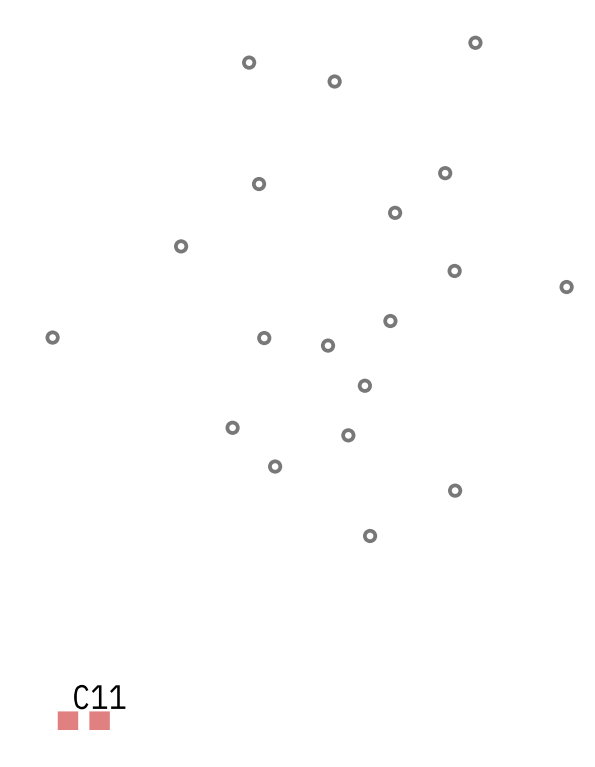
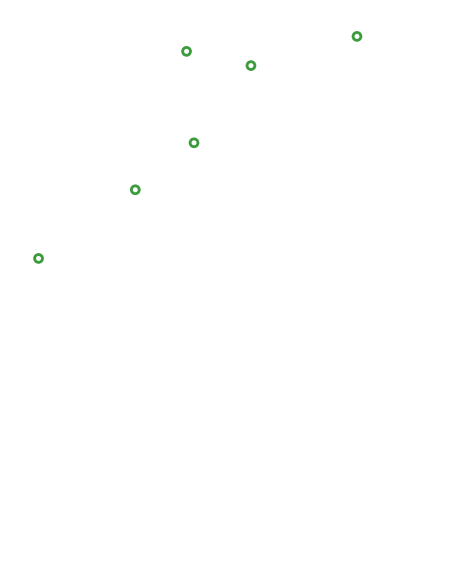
via: (445, 173) -> none
via: (395, 212) -> none
via: (454, 270) -> none
via: (566, 287) -> none
via: (390, 321) -> none
via: (264, 338) -> none
via: (328, 345) -> none
via: (364, 385) -> none
via: (232, 427) -> none
via: (348, 435) -> none
via: (275, 466) -> none
via: (455, 490) -> none
via: (370, 535) -> none
C11: (83, 720) -> none

